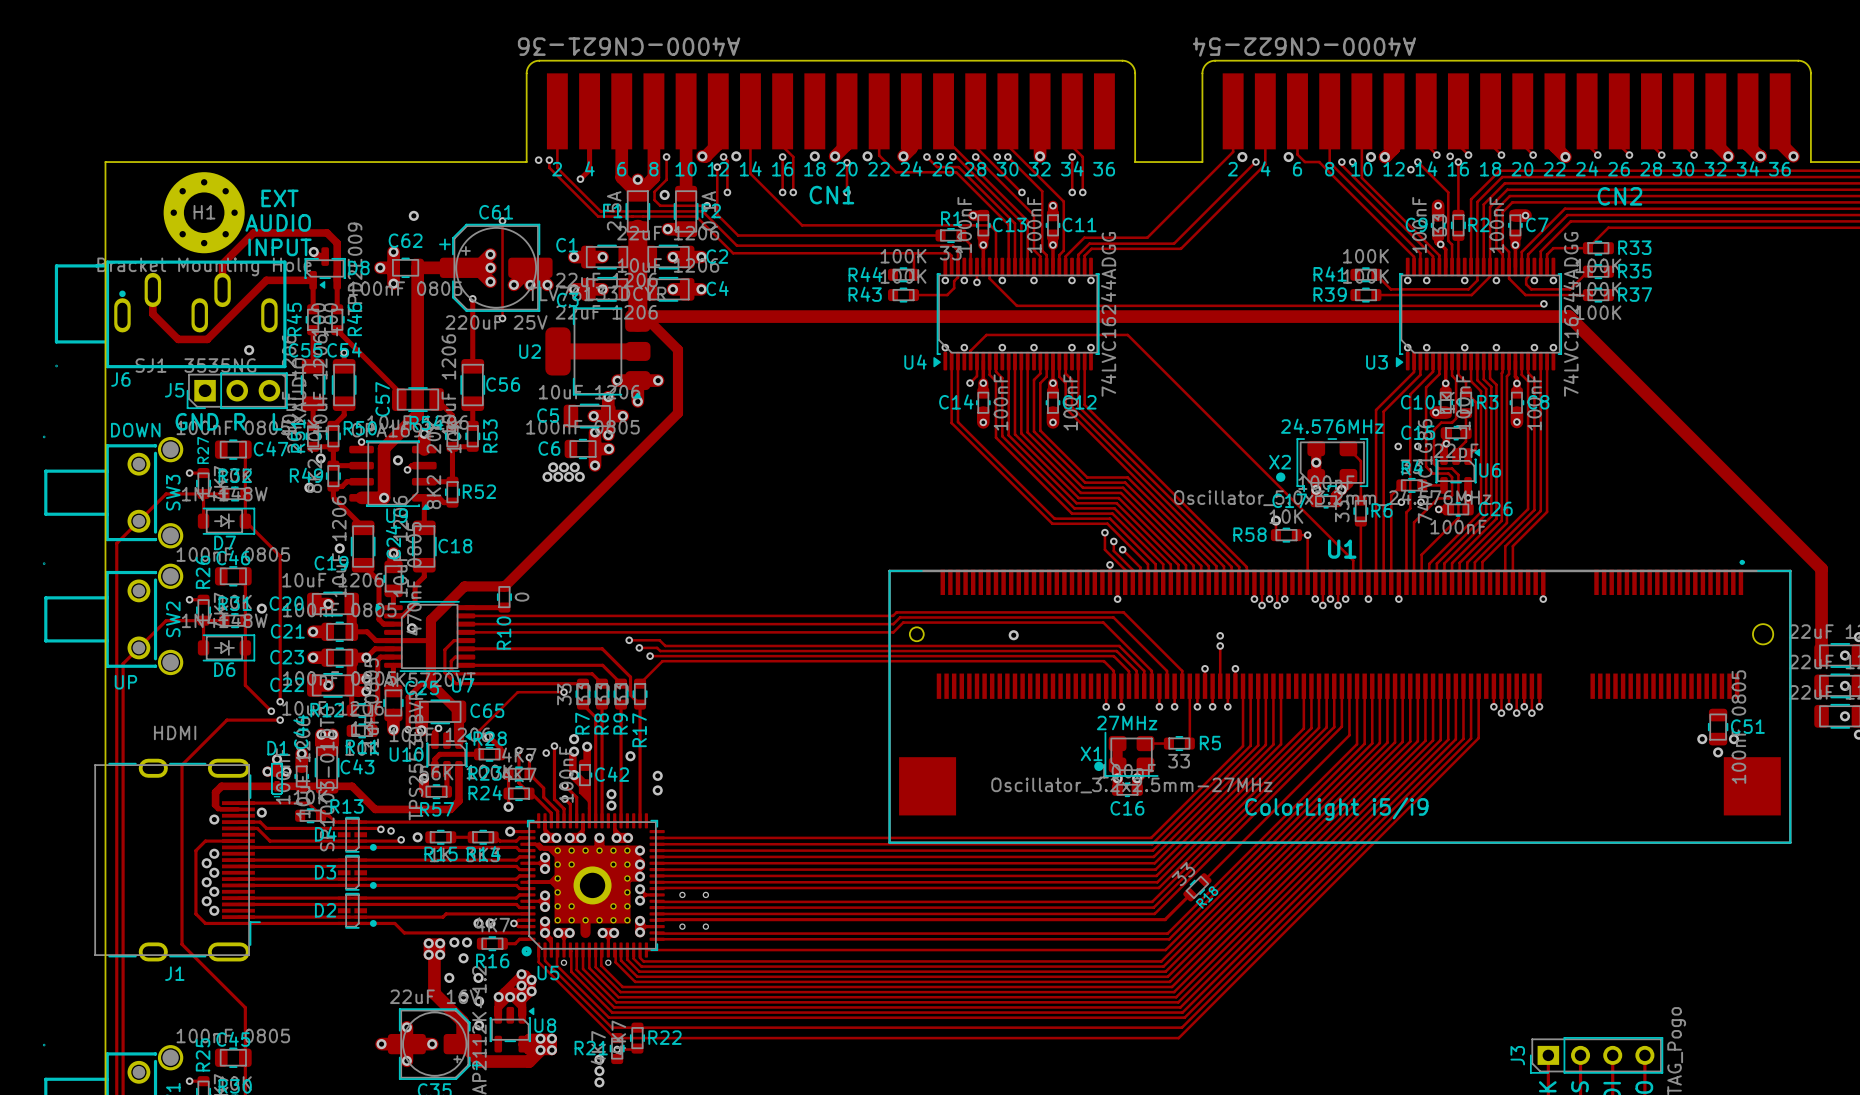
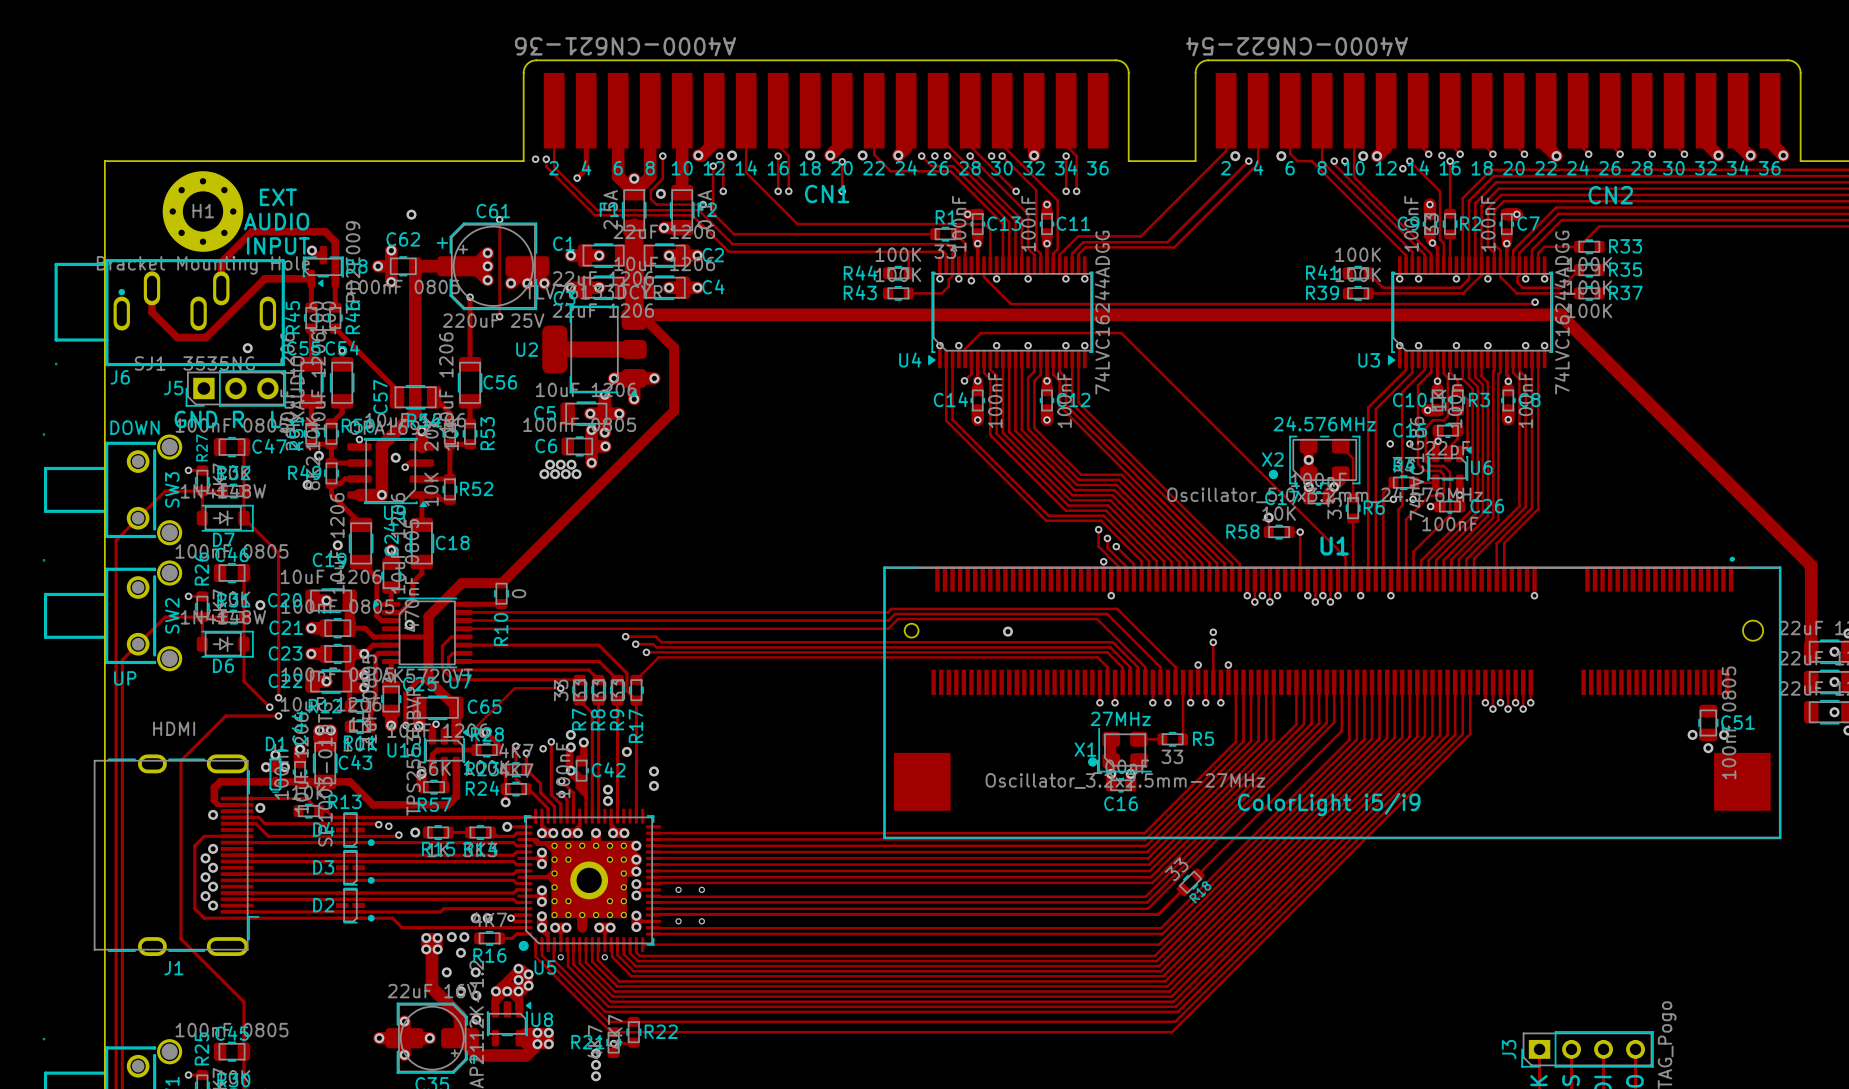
R52 value: 8K2 (433, 492) -> 10K (431, 489)

